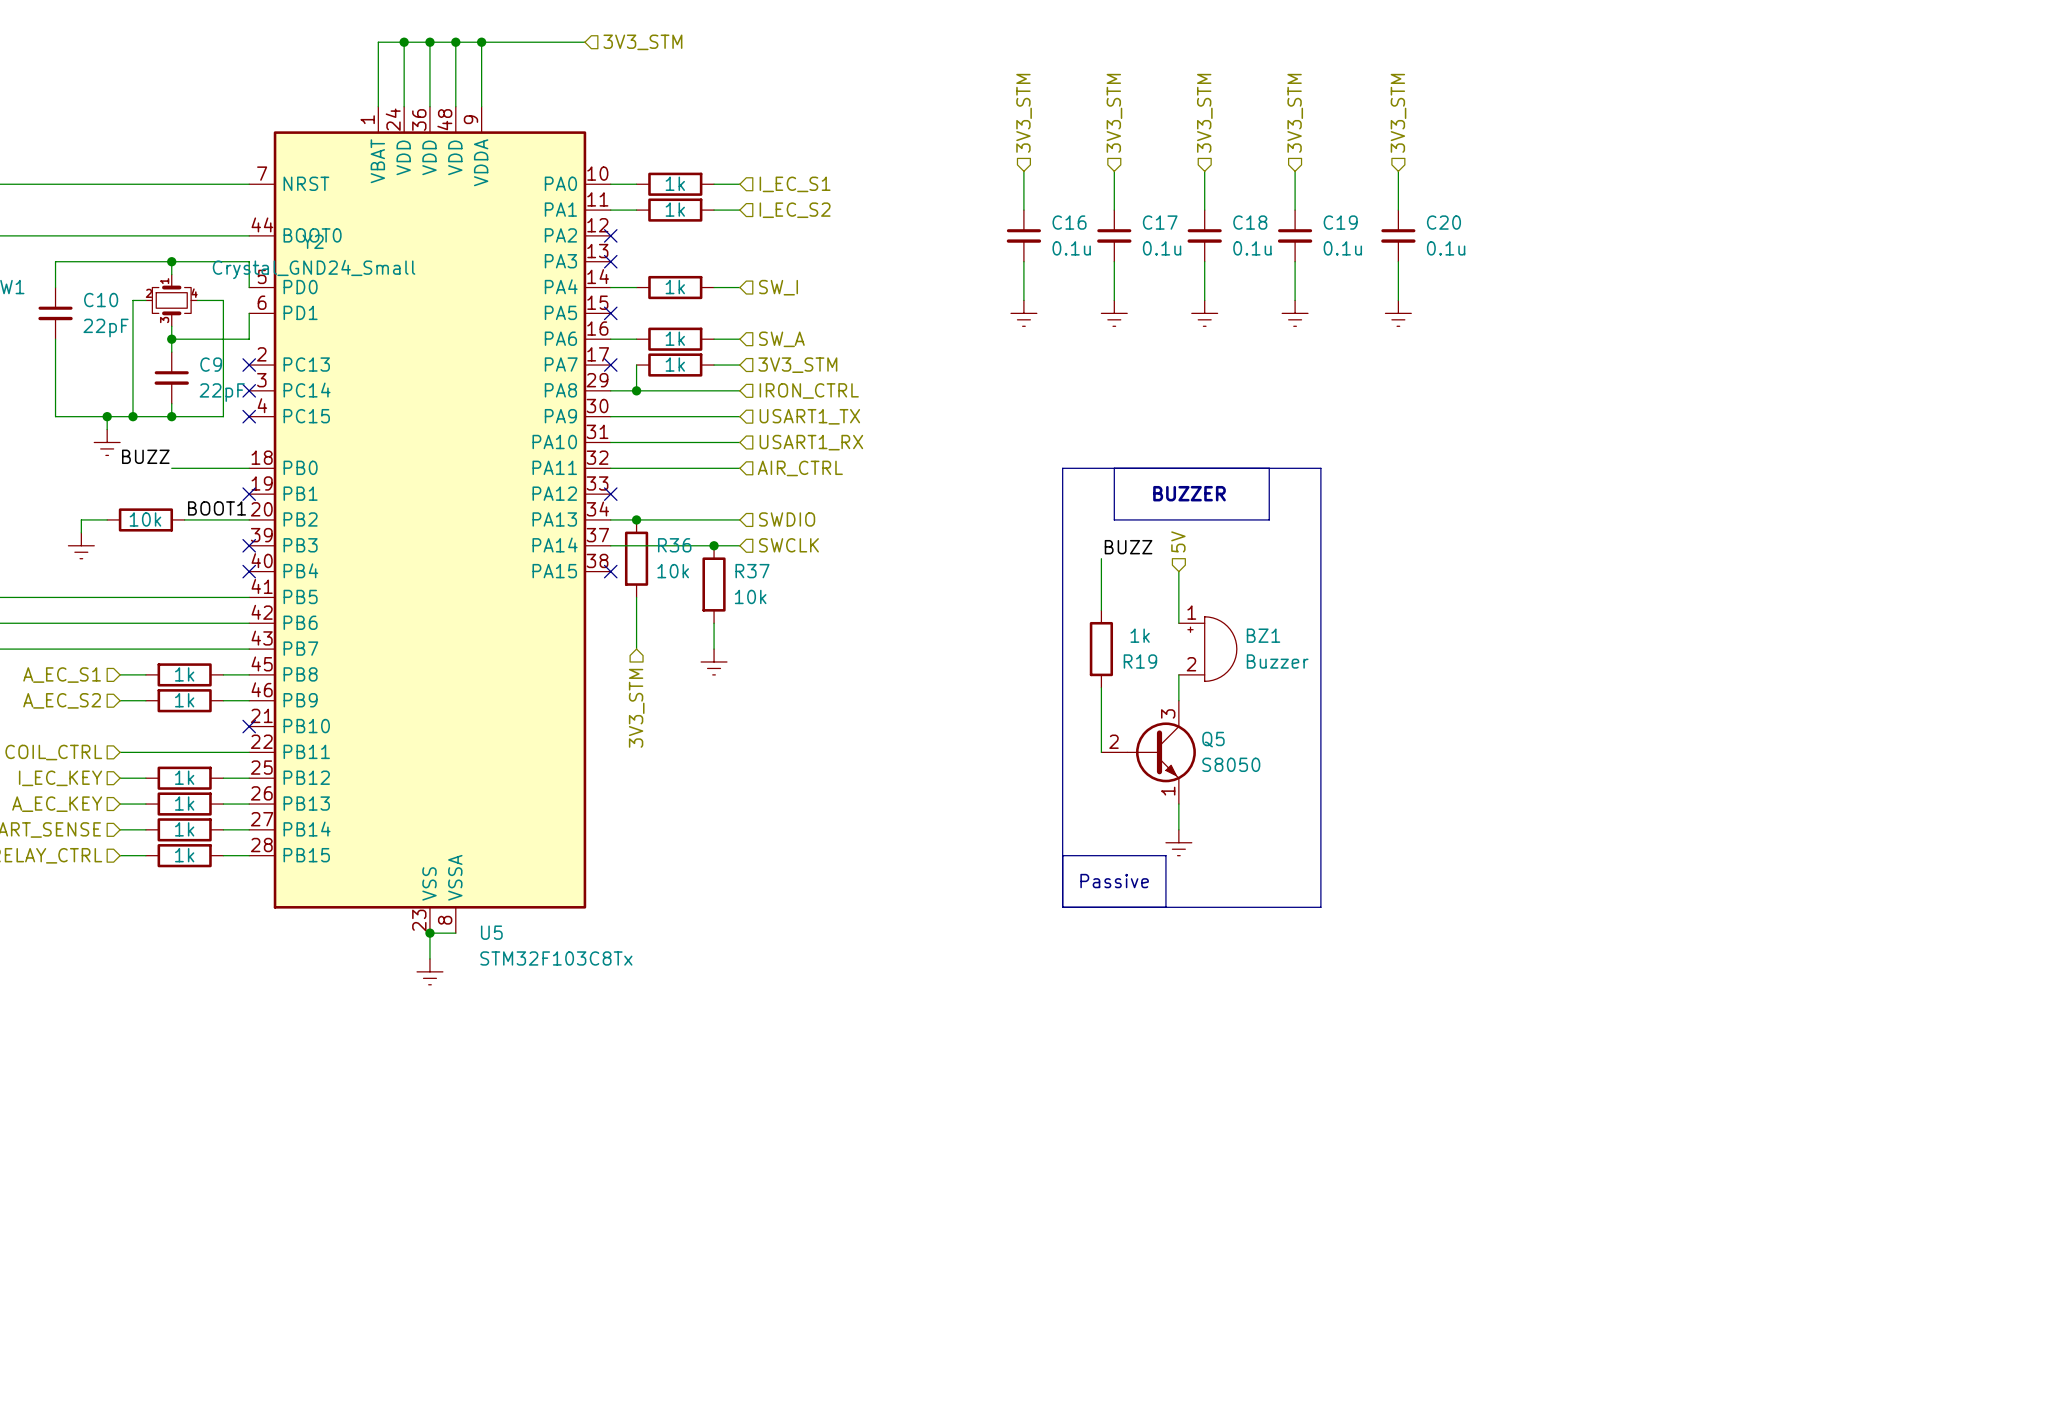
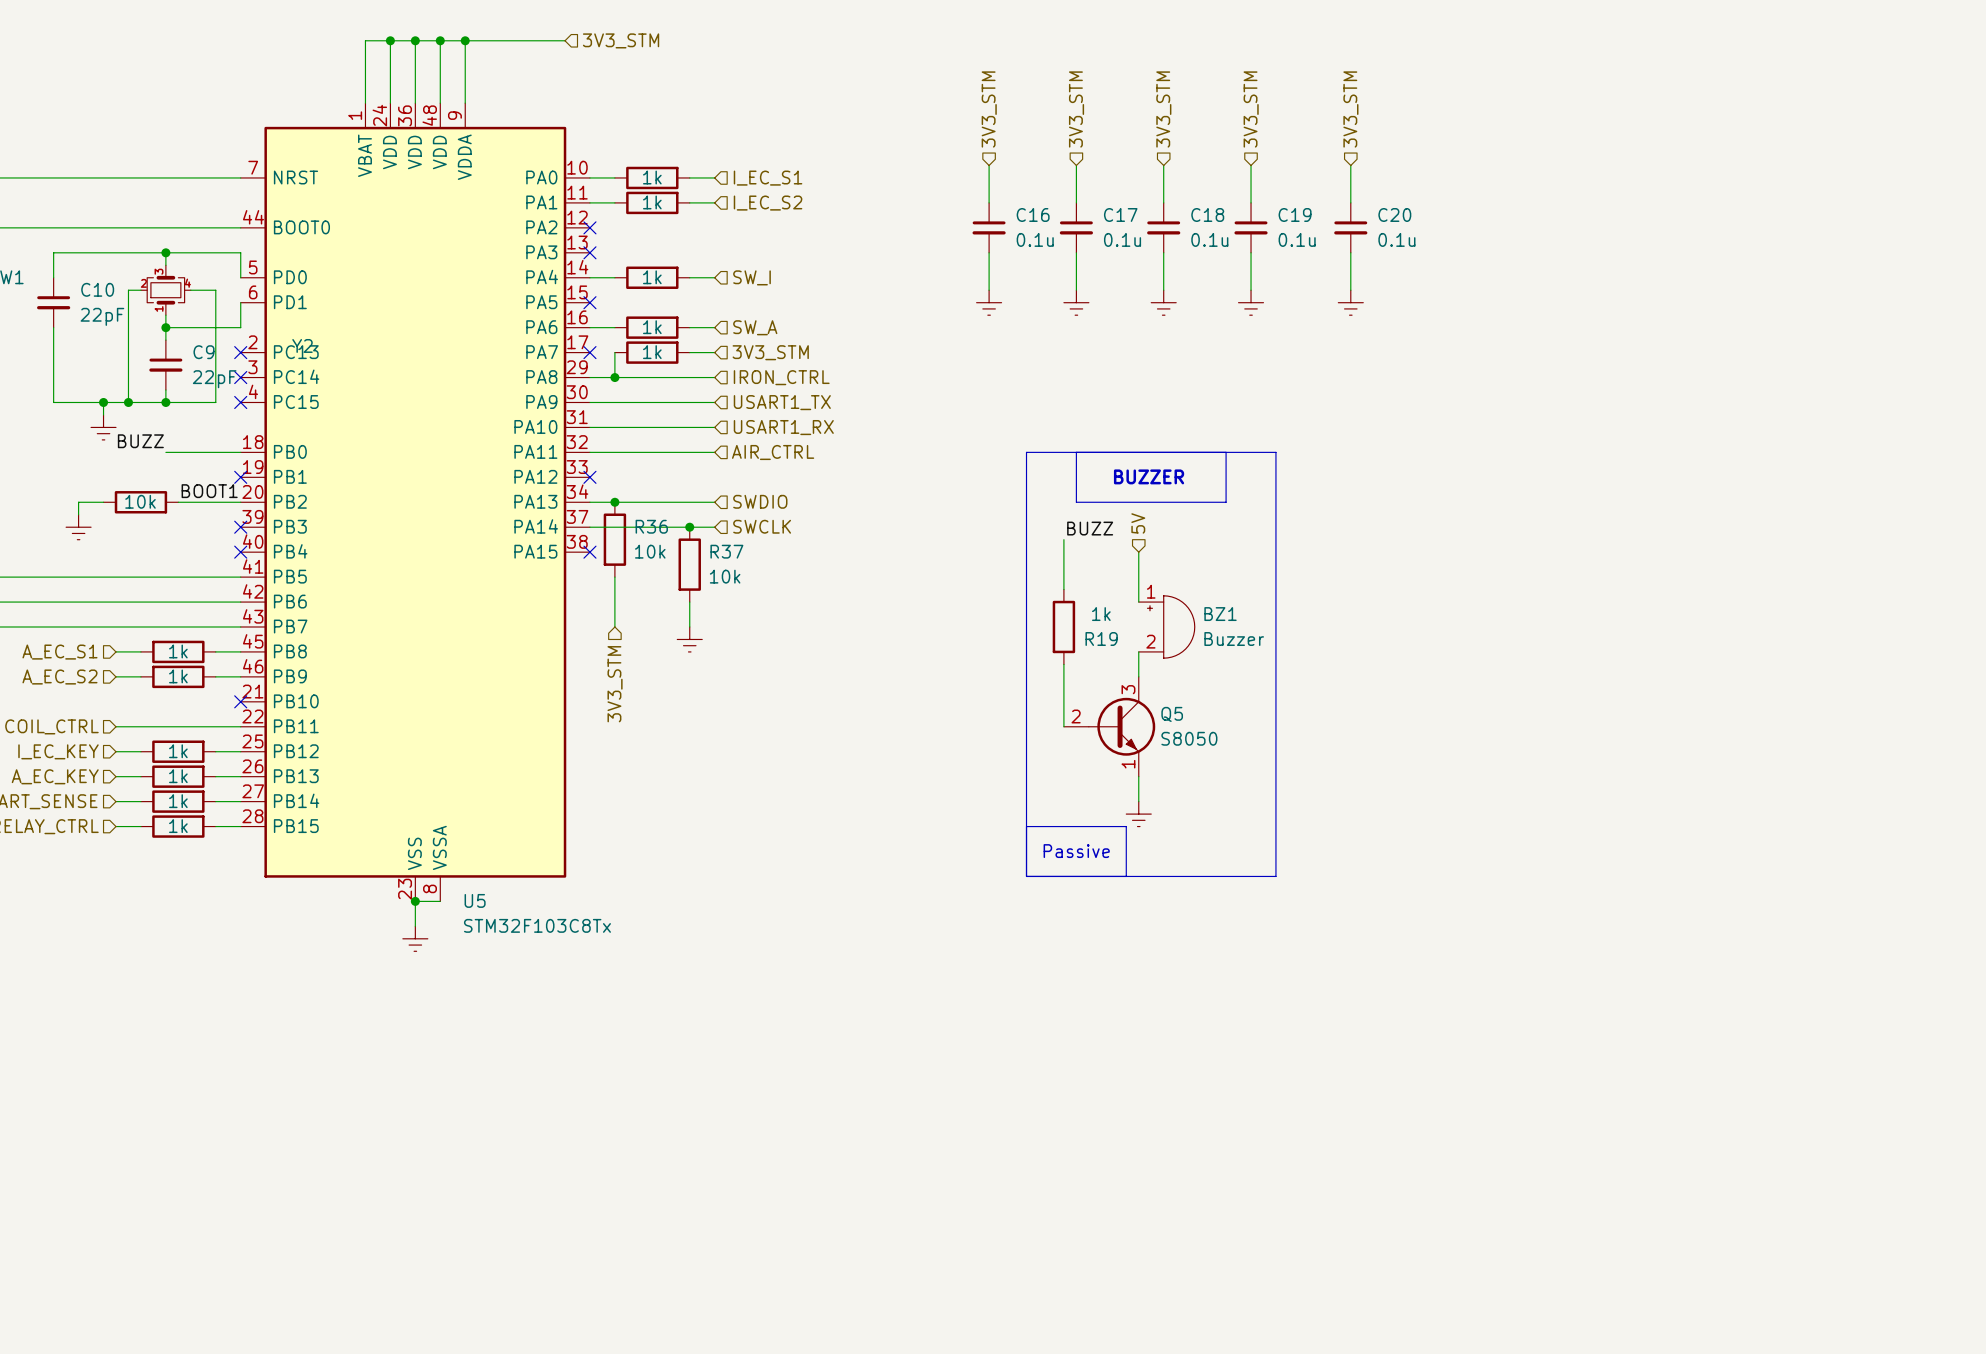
Y2 value: Crystal_GND24_Small (314, 269) -> none
Y2 flip: as is (171, 300) -> up-down (165, 290)

